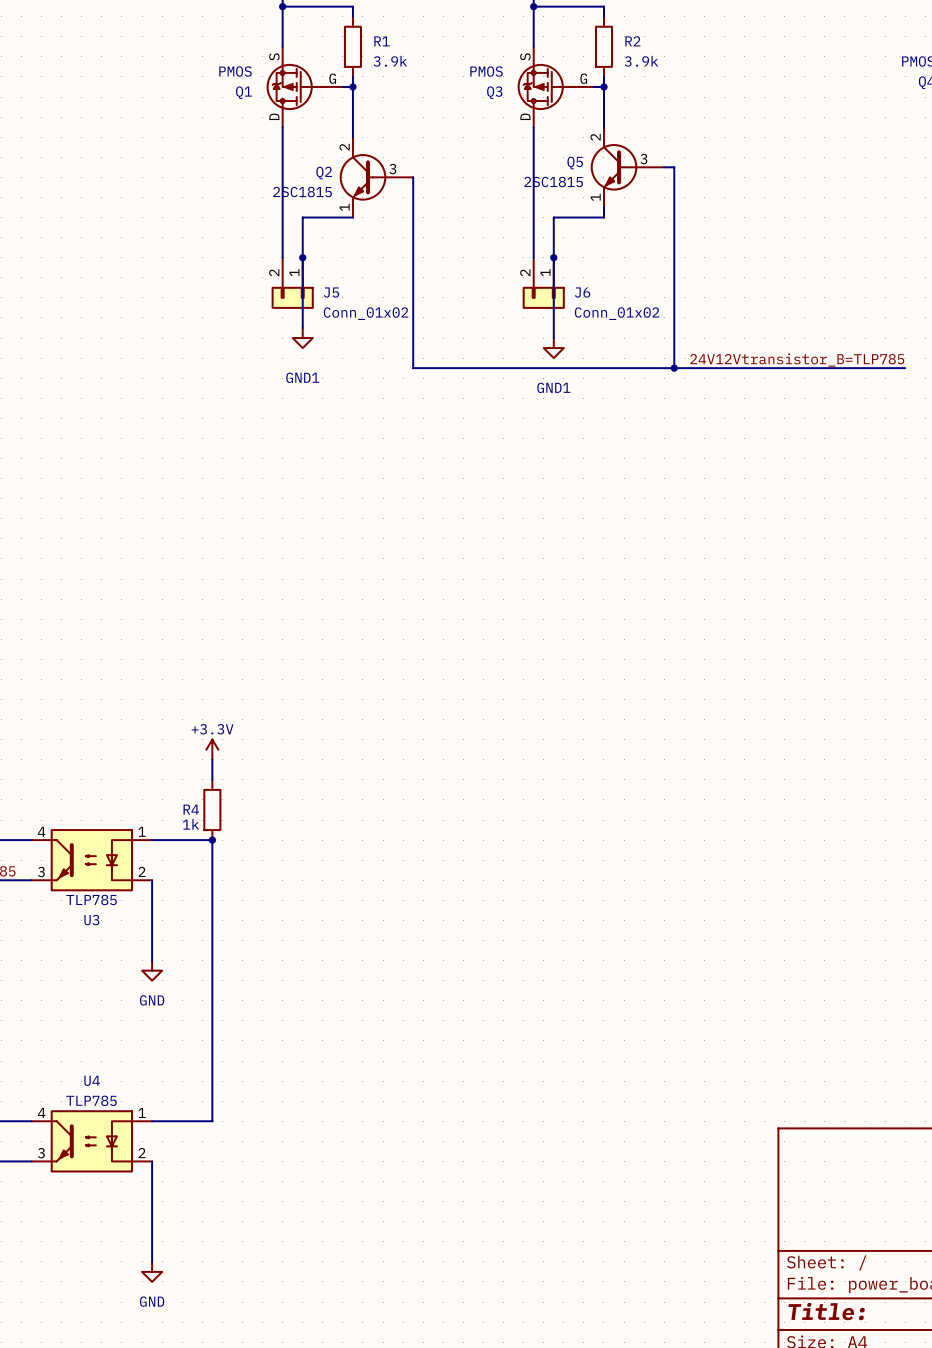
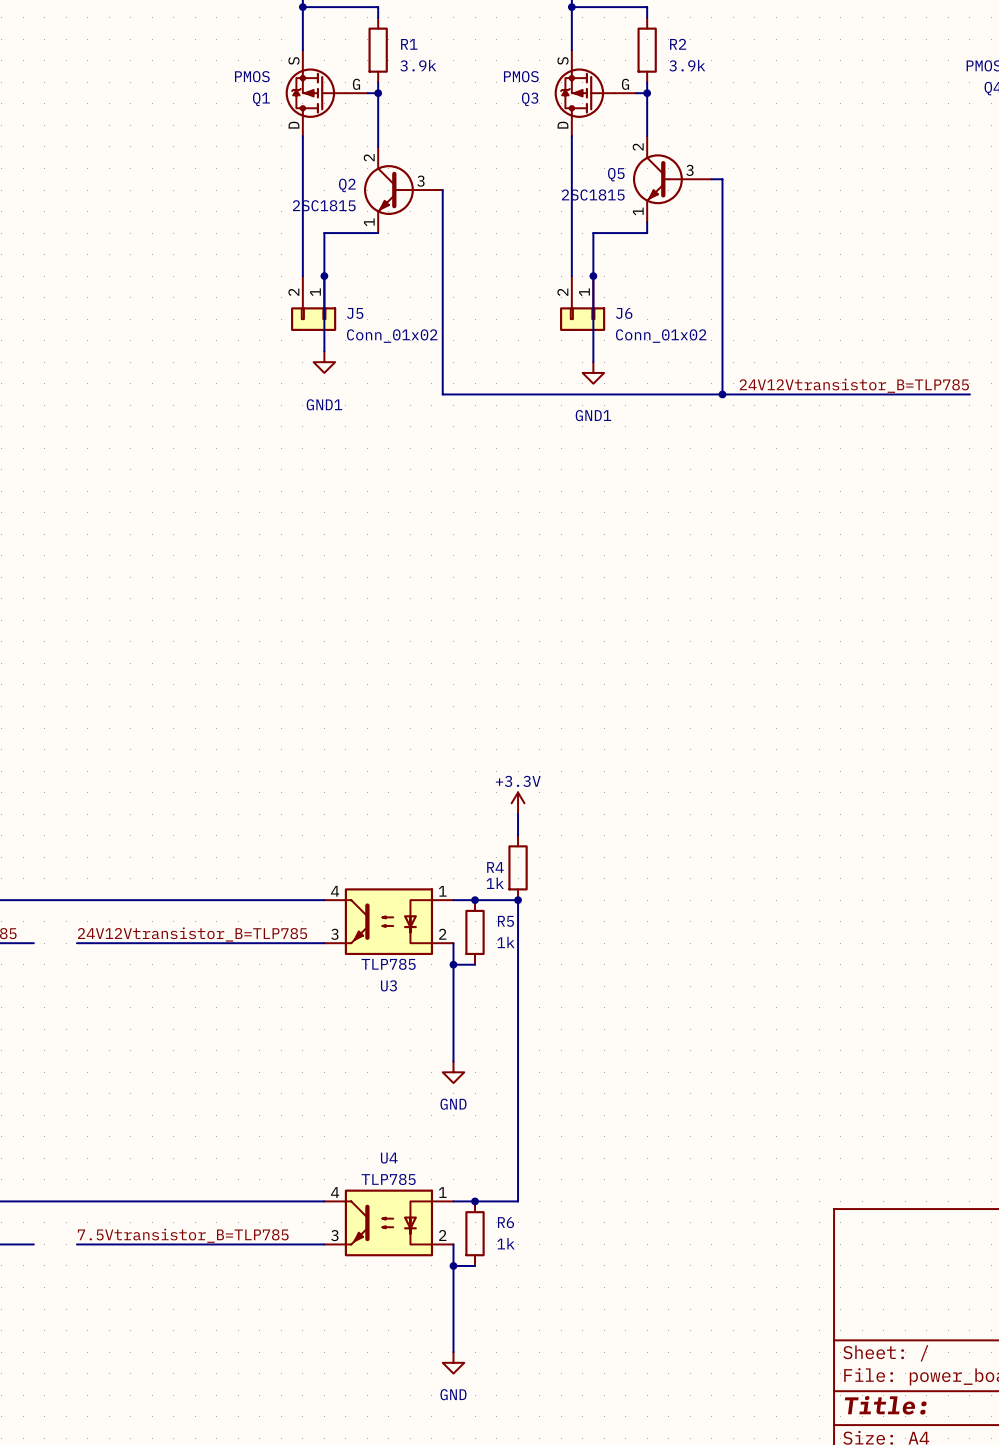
power symbol: +3.3V (212, 749) -> none
power symbol: none -> +3.3V (518, 803)
wire: (212, 759) (212, 779) -> none
wire: none -> (518, 814) (518, 835)
R4 position: (212, 809) -> (518, 867)
wire: (212, 840) (212, 1121) -> (227, 900) (324, 900)
junction: (212, 840) -> none
wire: none -> (453, 900) (518, 900) (518, 1201) (453, 1201)
junction: none -> (475, 900)
junction: none -> (518, 900)
U3 position: (91, 860) -> (388, 921)
R5: none -> 1k (475, 932)
label: none -> 24V12Vtransistor_B=TLP785 (192, 934)
wire: none -> (76, 943) (324, 943)
wire: (152, 880) (152, 960) -> none
wire: none -> (453, 943) (453, 1061)
wire: none -> (453, 964) (475, 964)
junction: none -> (453, 964)
power symbol: GND (152, 970) -> none
power symbol: none -> GND (453, 1072)
wire: none -> (227, 1201) (324, 1201)
junction: none -> (475, 1201)
U4 position: (91, 1141) -> (388, 1222)
R6: none -> 1k (475, 1233)
label: none -> 7.5Vtransistor_B=TLP785 (183, 1235)
wire: none -> (76, 1244) (324, 1244)
wire: (152, 1161) (152, 1261) -> none
wire: none -> (453, 1244) (453, 1352)
wire: none -> (453, 1265) (475, 1265)
junction: none -> (453, 1265)
power symbol: GND (152, 1271) -> none
power symbol: none -> GND (453, 1362)

